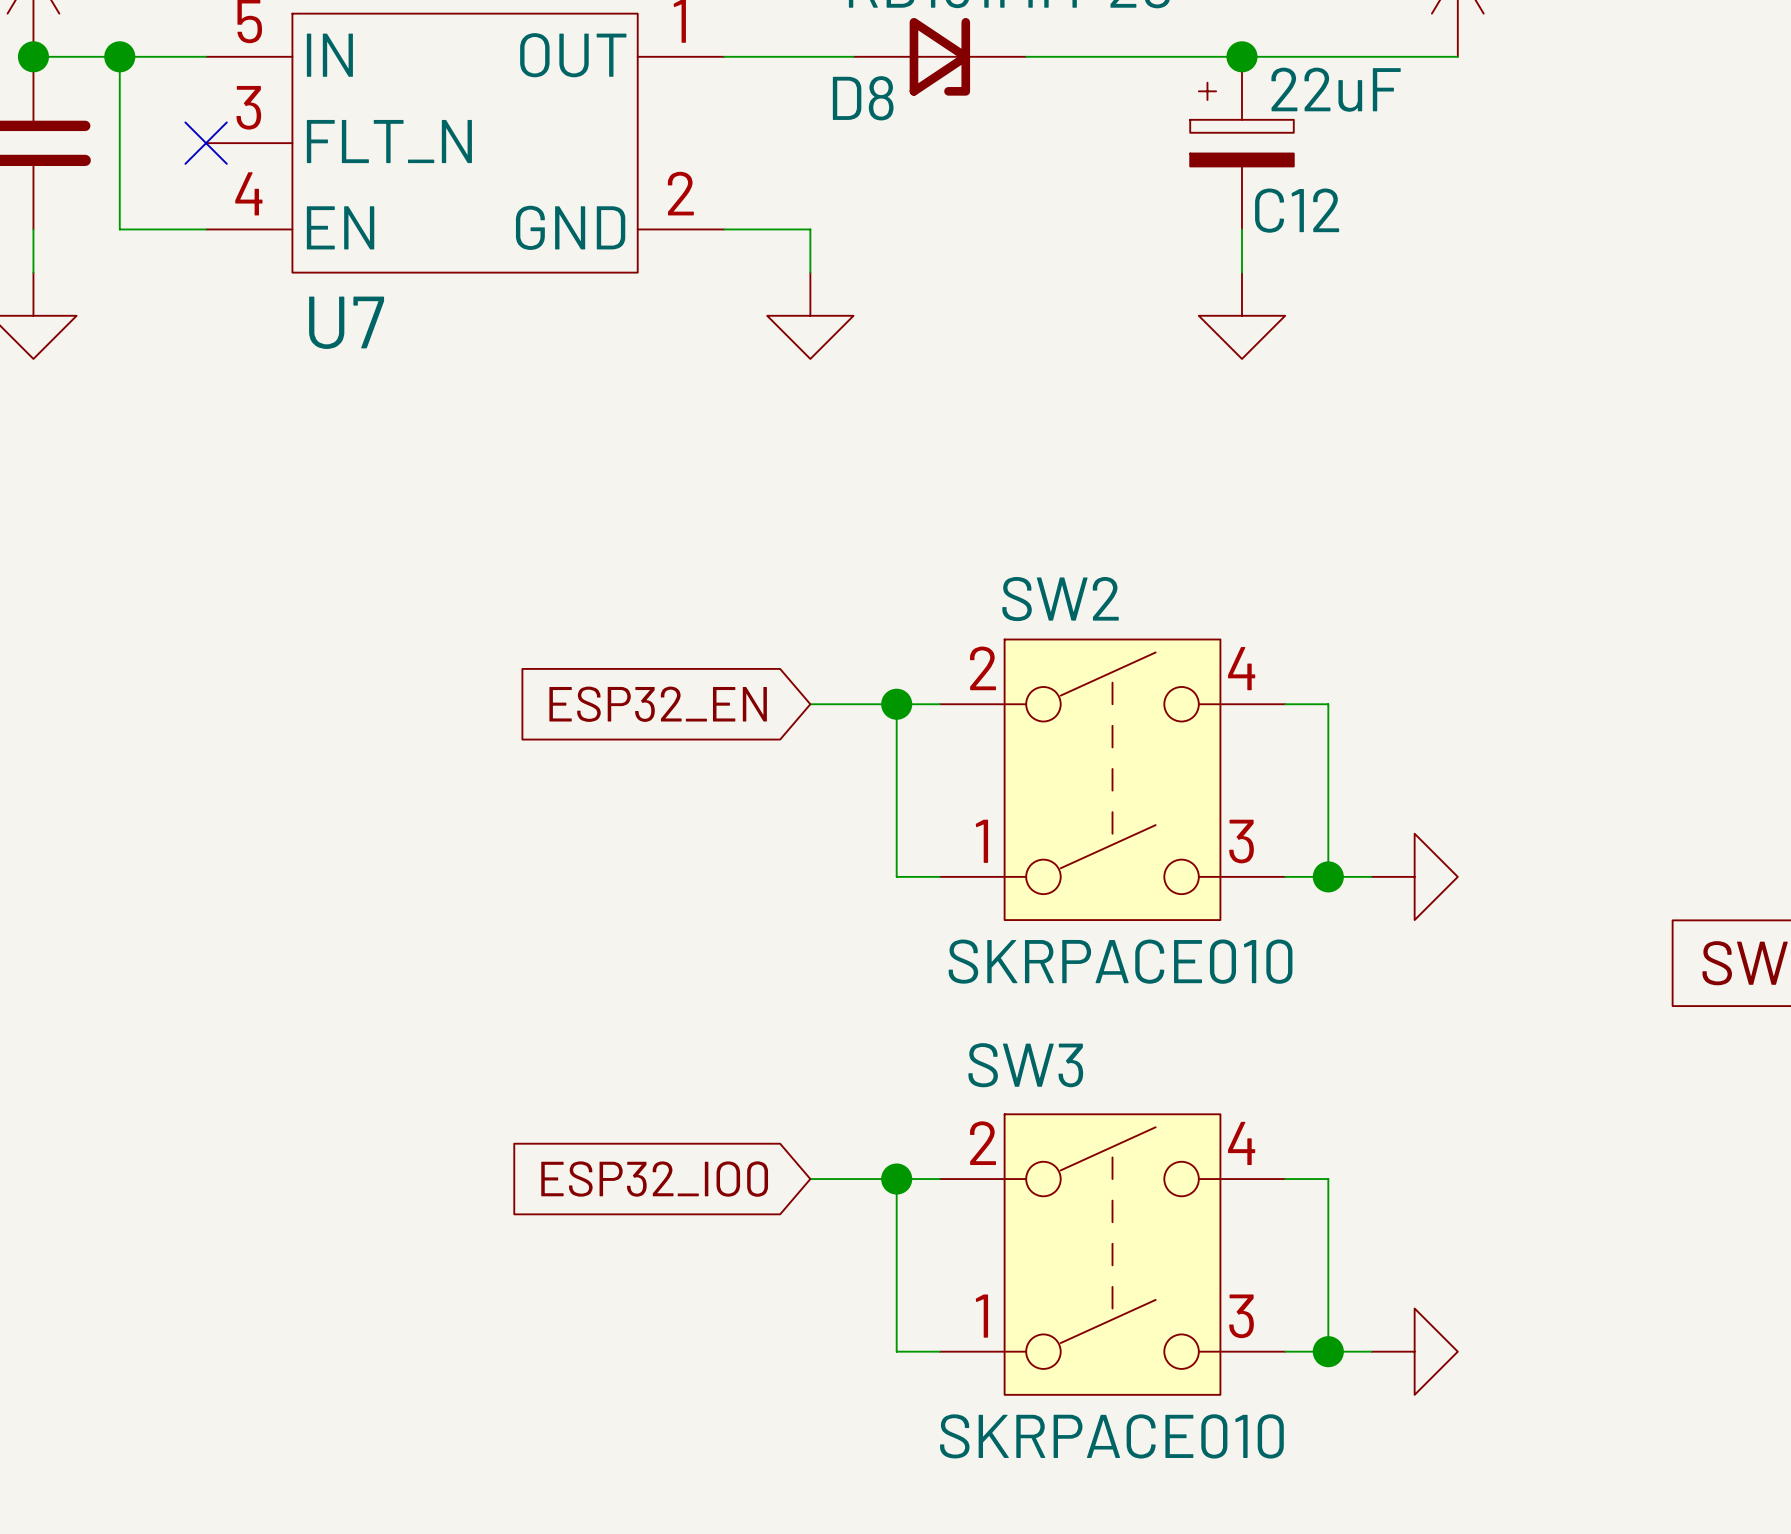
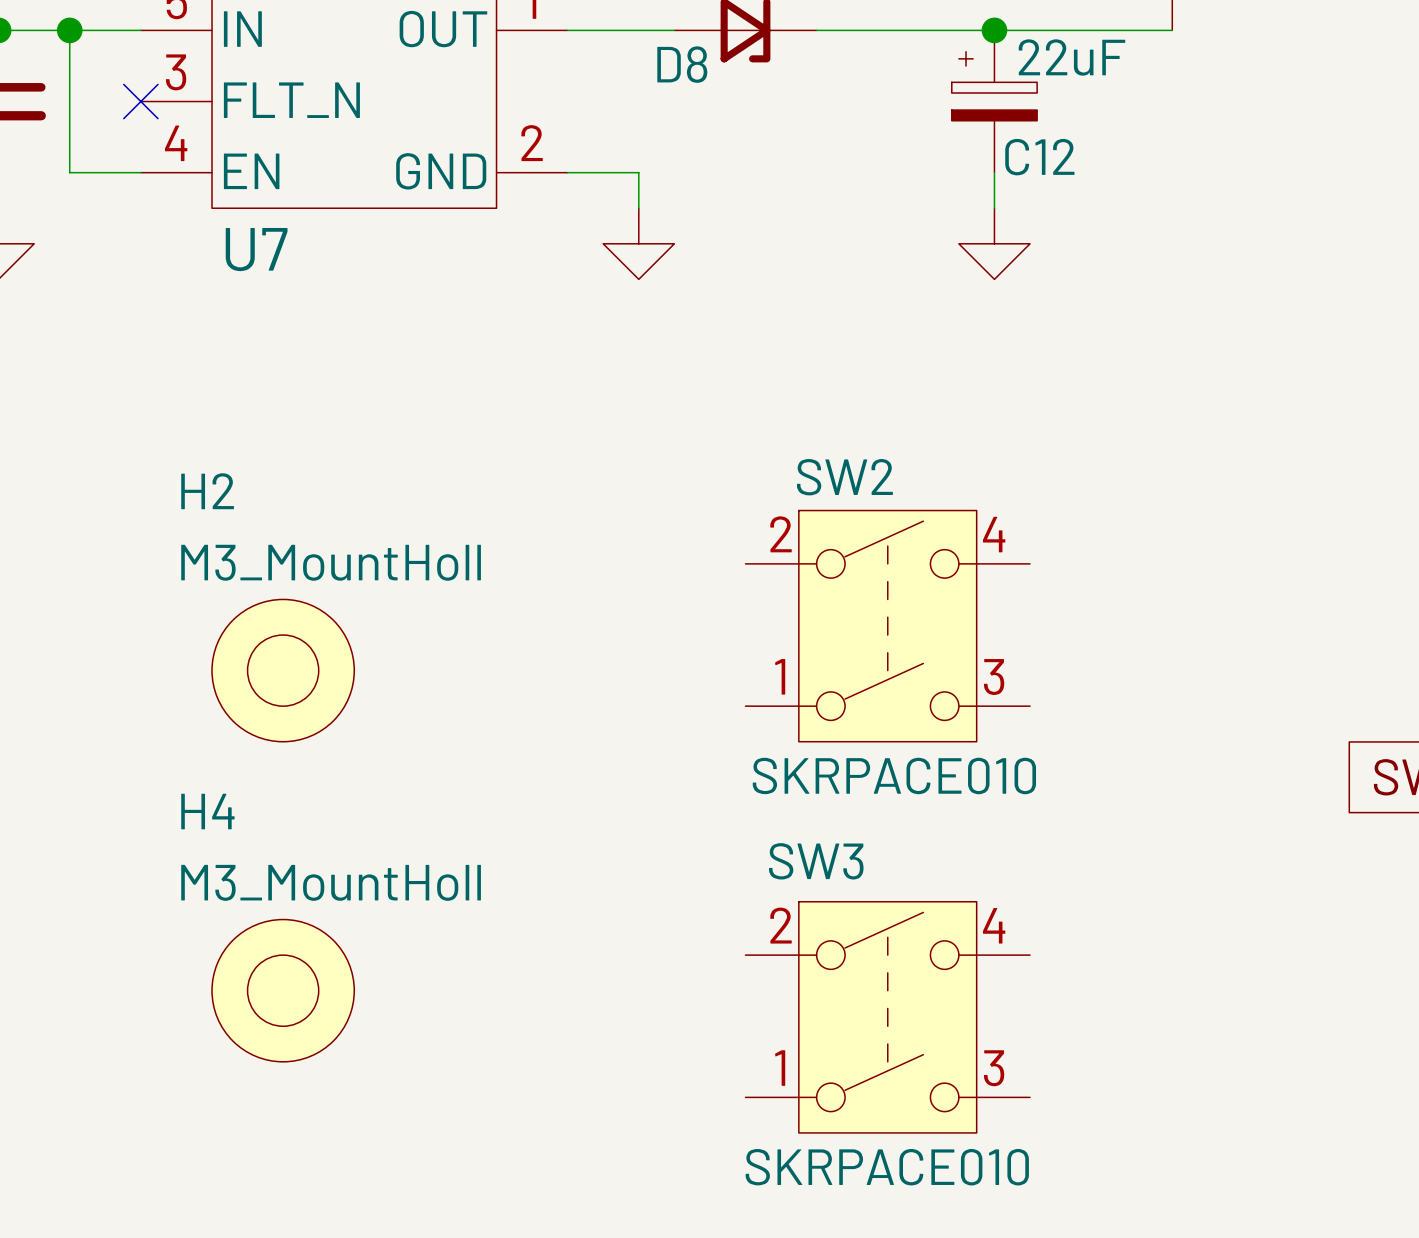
global label: ESP32_EN (658, 704) -> none
wire: (810, 704) (939, 704) -> none
wire: (896, 704) (896, 876) (939, 876) -> none
junction: (896, 704) -> none
wire: (1285, 704) (1328, 704) (1328, 876) -> none
H2: none -> M3_MountHoll (283, 670)
wire: (1285, 876) (1371, 876) -> none
junction: (1328, 876) -> none
power symbol: (1414, 876) -> none
global label: ESP32_IO0 (654, 1179) -> none
wire: (810, 1179) (939, 1179) -> none
wire: (896, 1179) (896, 1351) (939, 1351) -> none
junction: (896, 1179) -> none
wire: (1285, 1179) (1328, 1179) (1328, 1351) -> none
H4: none -> M3_MountHoll (283, 990)
wire: (1285, 1351) (1371, 1351) -> none
junction: (1328, 1351) -> none
power symbol: (1414, 1351) -> none

